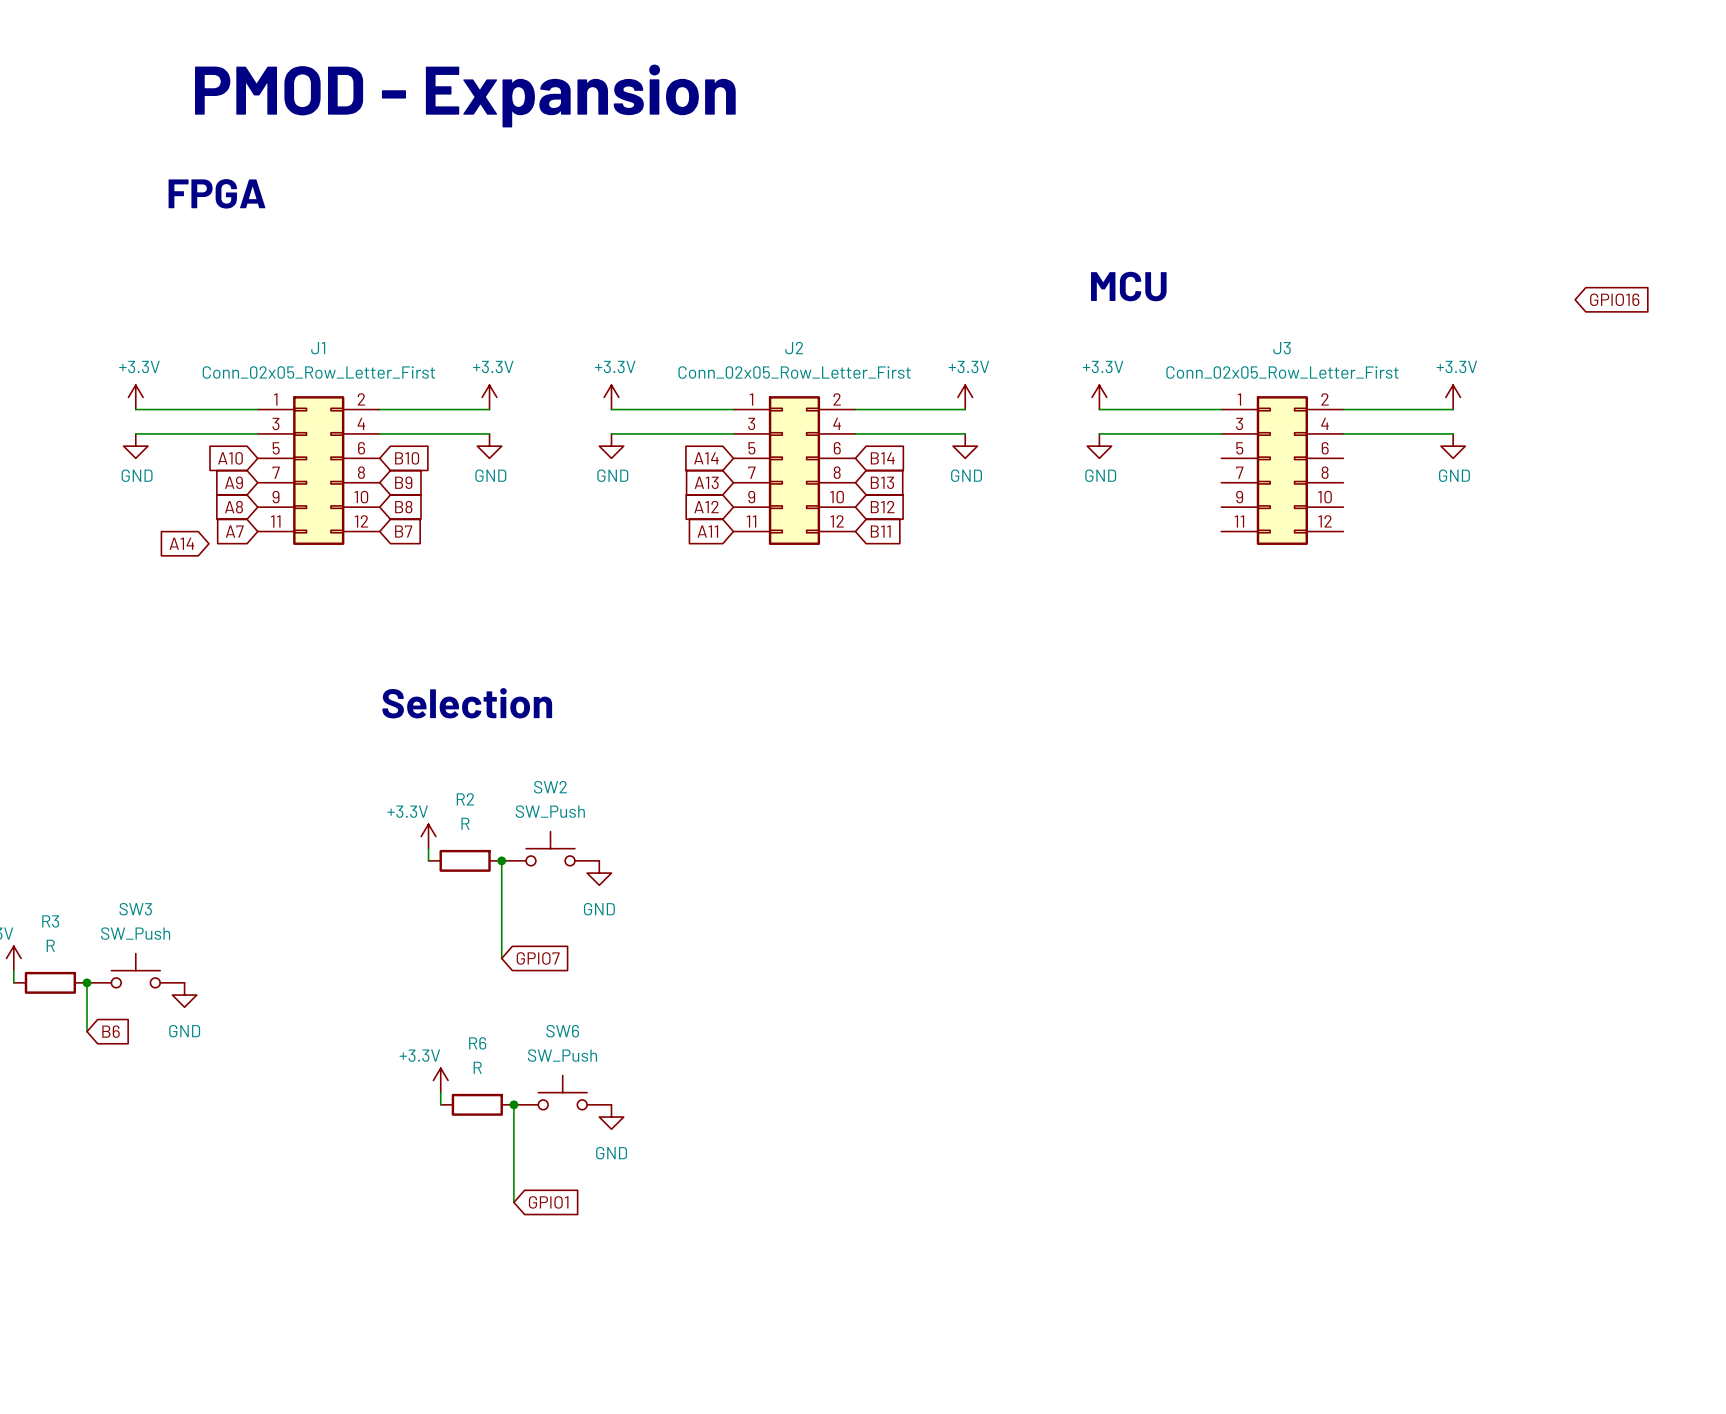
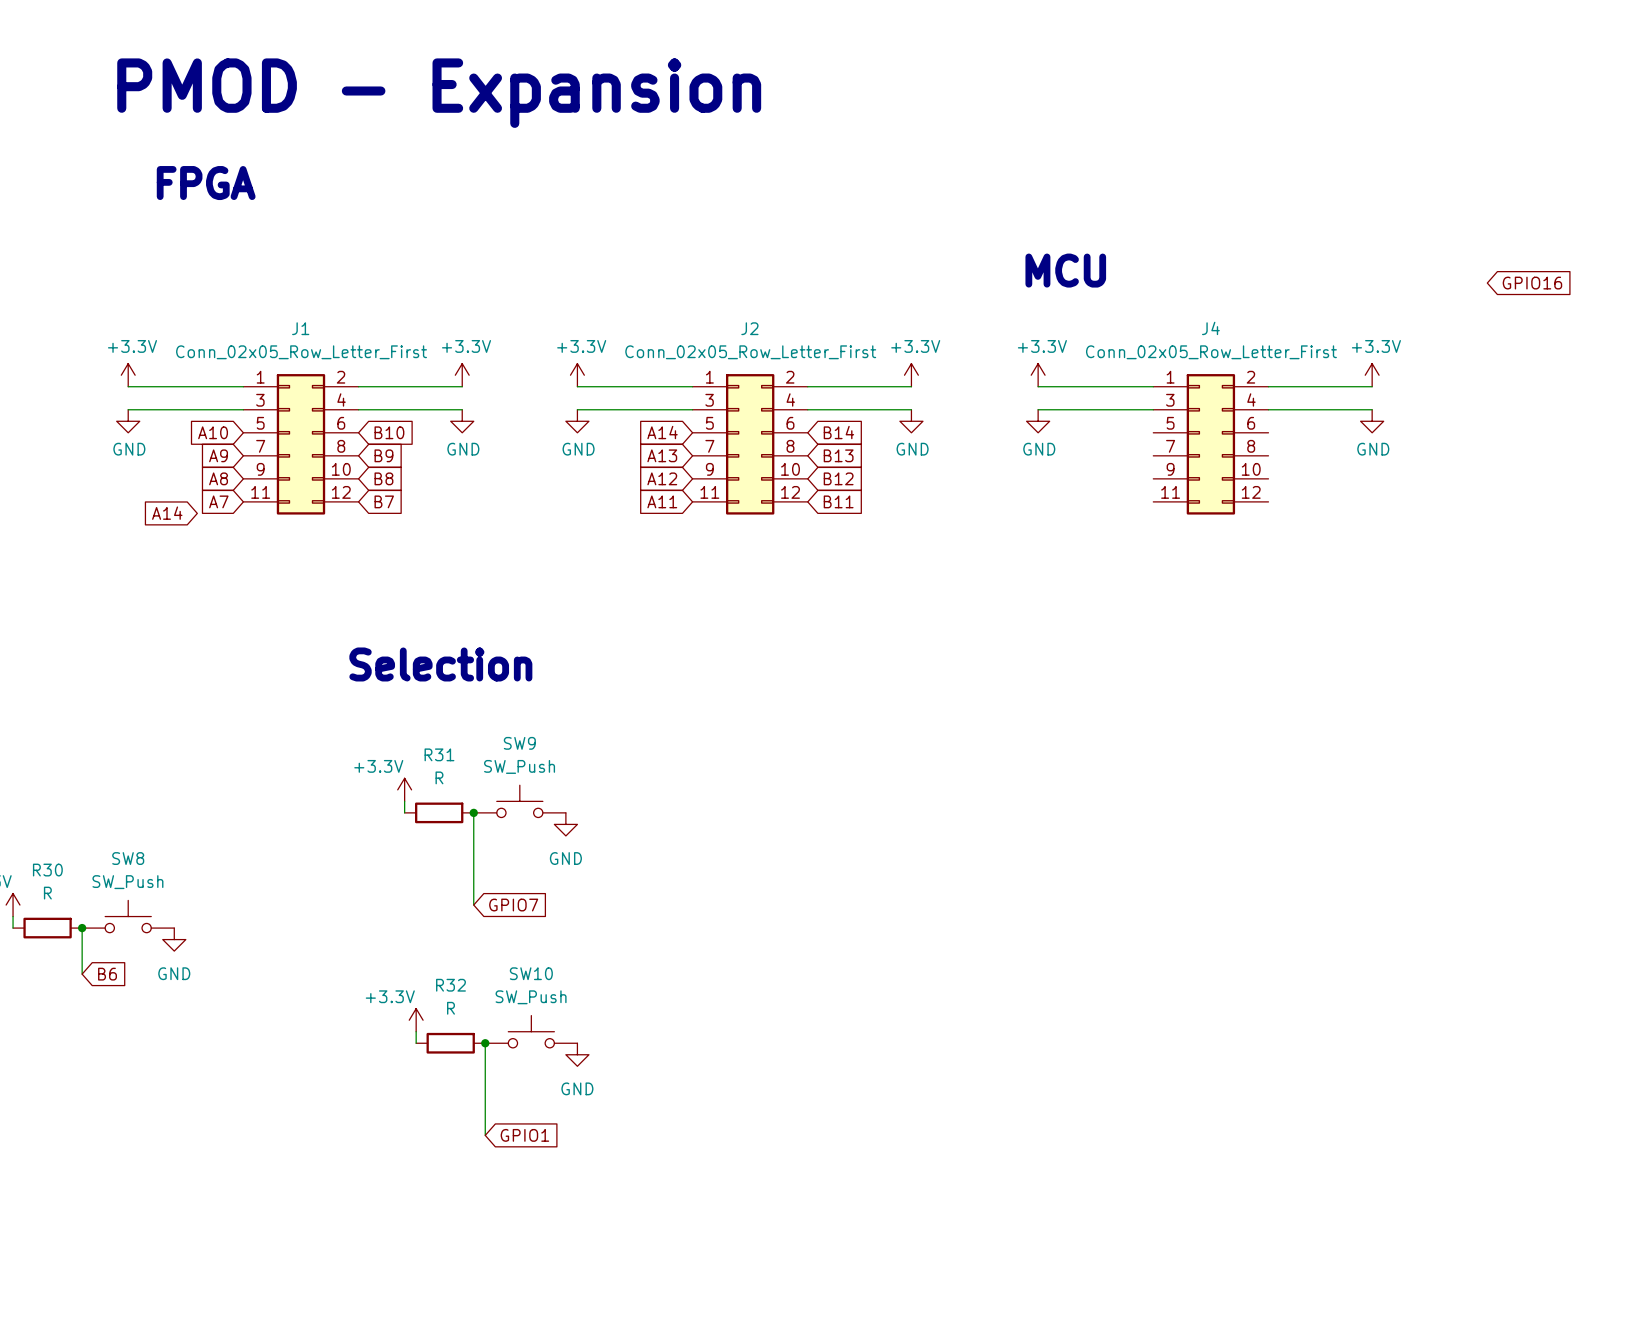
J3 name: J3 (1282, 348) -> J4 (1210, 328)
SW2 name: SW2 (550, 787) -> SW9 (519, 743)
R2 name: R2 (465, 799) -> R31 (439, 754)
SW3 name: SW3 (135, 909) -> SW8 (128, 858)
R3 name: R3 (50, 921) -> R30 (47, 870)
SW6 name: SW6 (562, 1031) -> SW10 (531, 973)
R6 name: R6 (477, 1043) -> R32 (450, 985)

